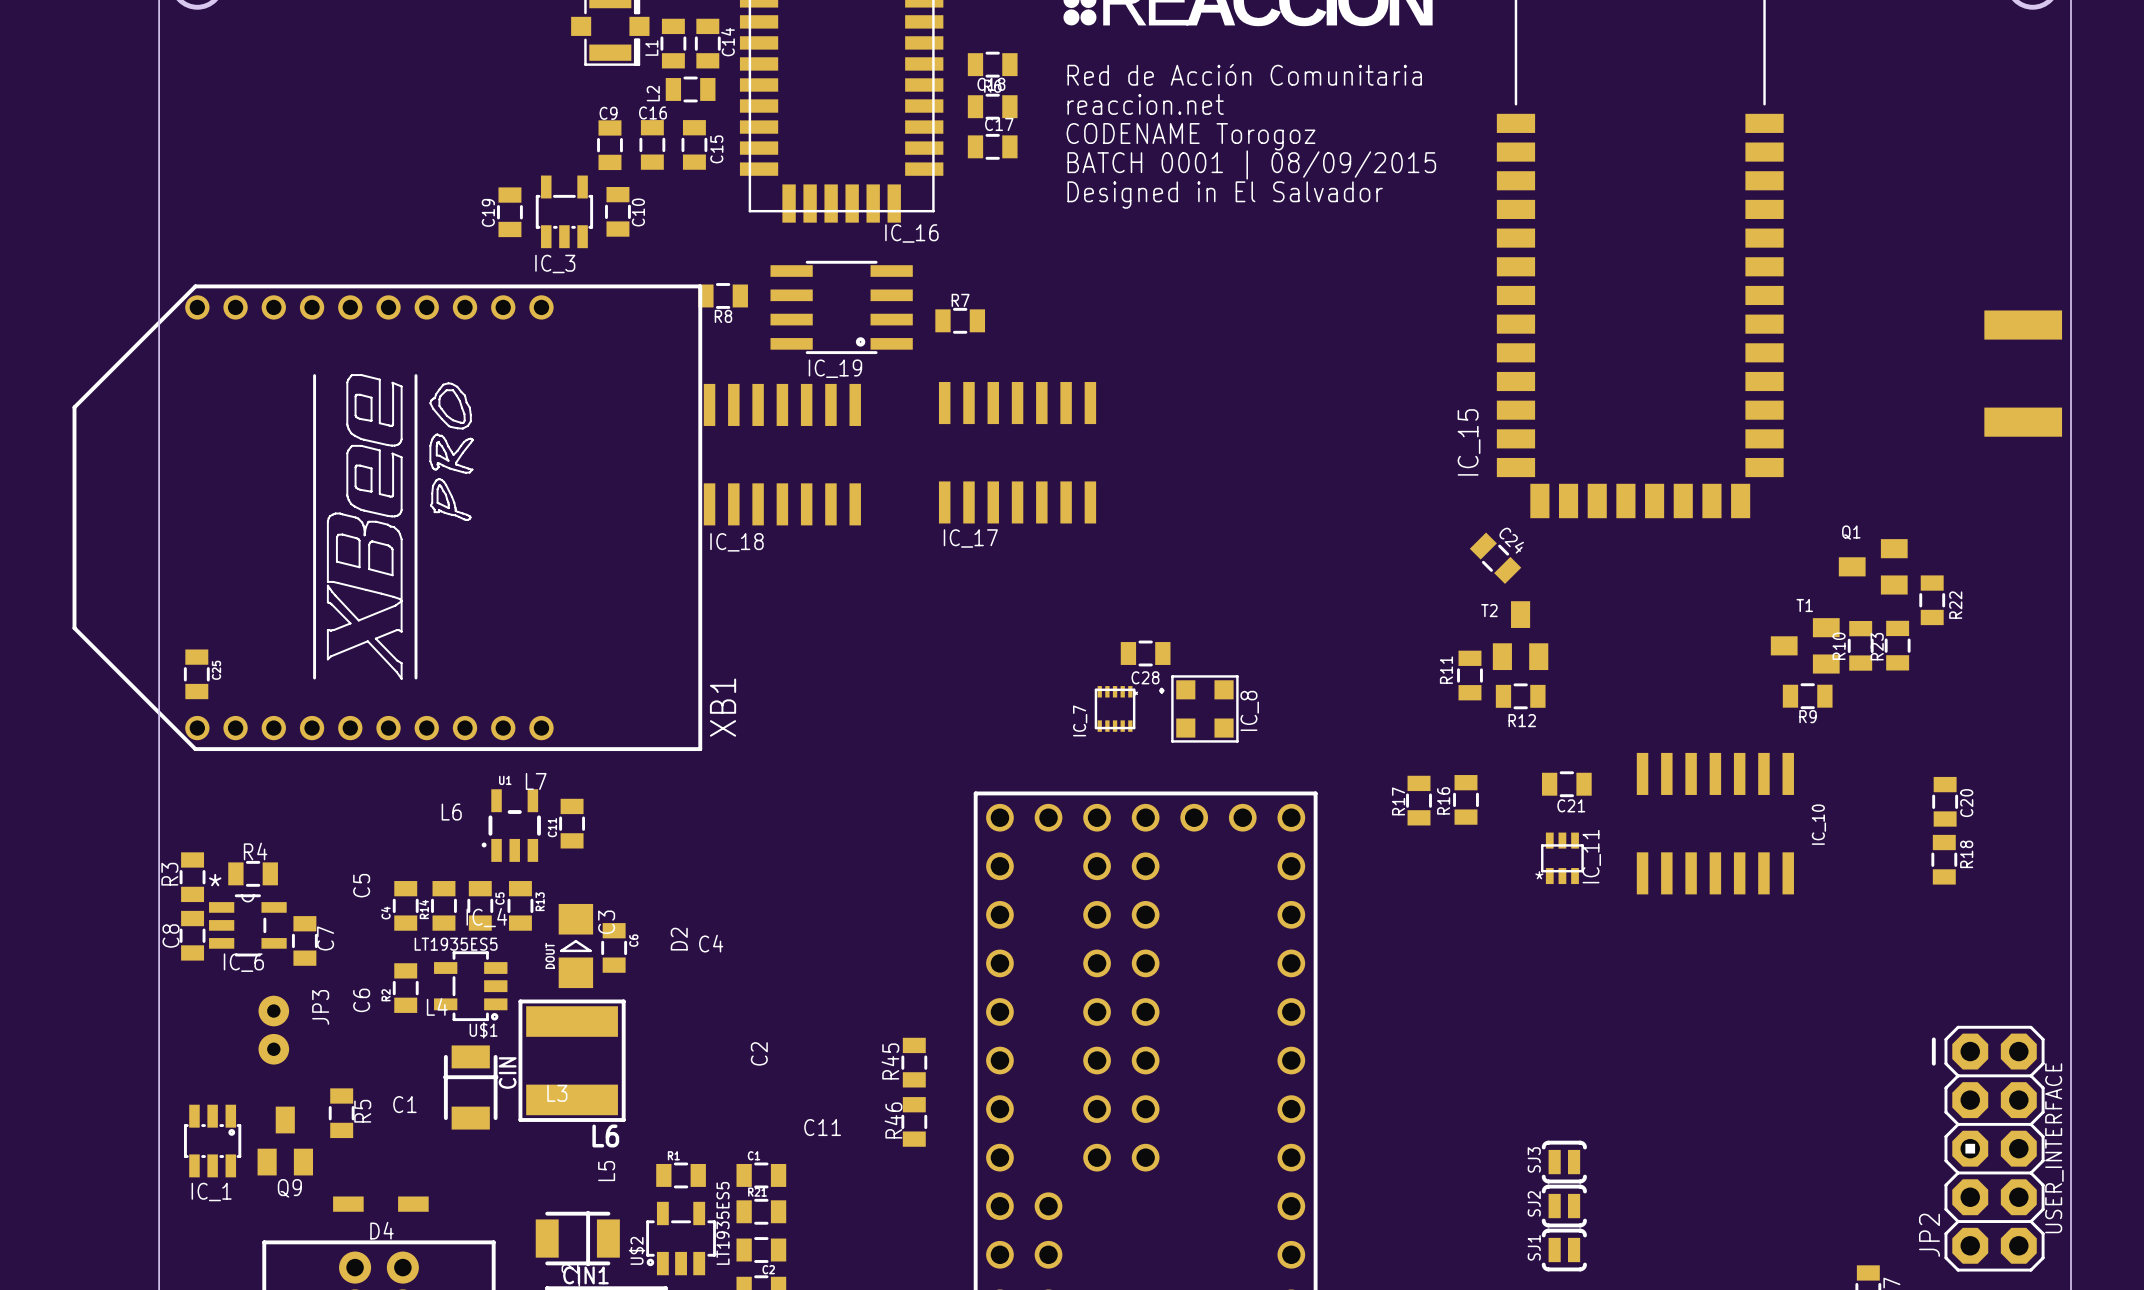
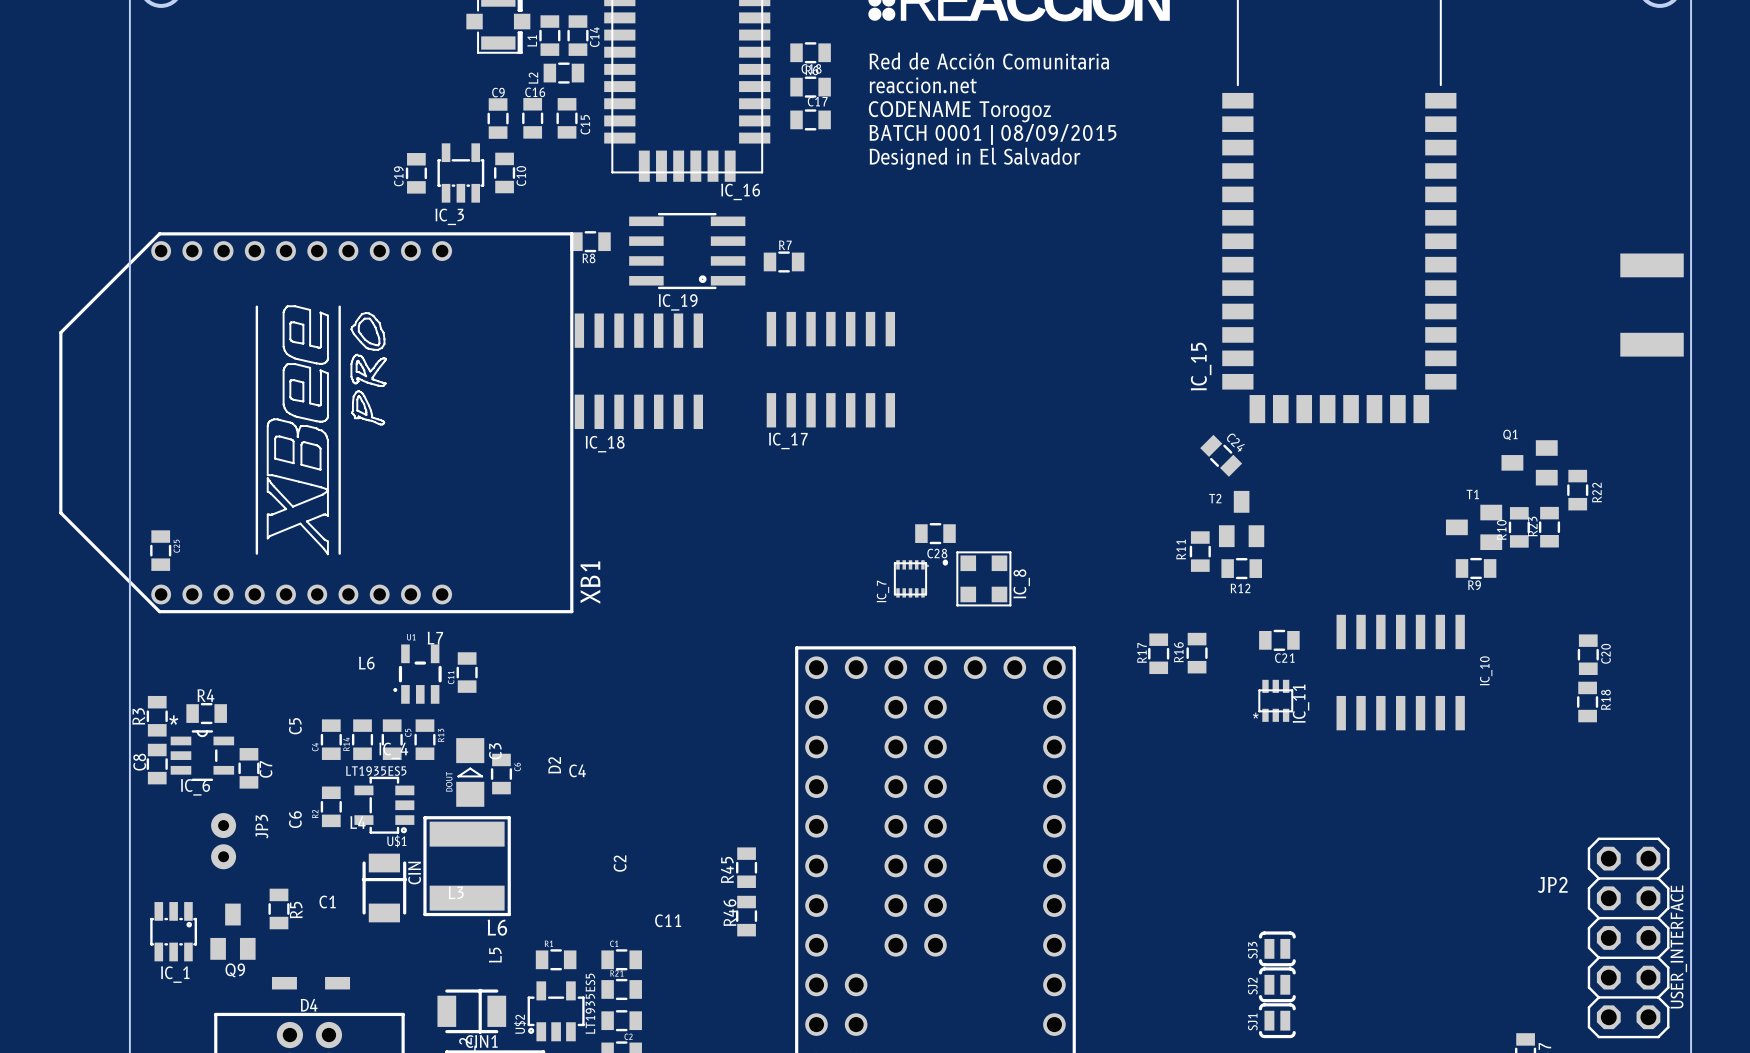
JP2 footprint: [1931, 1025, 2045, 1272] -> [1587, 837, 1670, 1039]
JP2 name position: JP2 (1929, 1235) -> JP2 (1552, 884)

